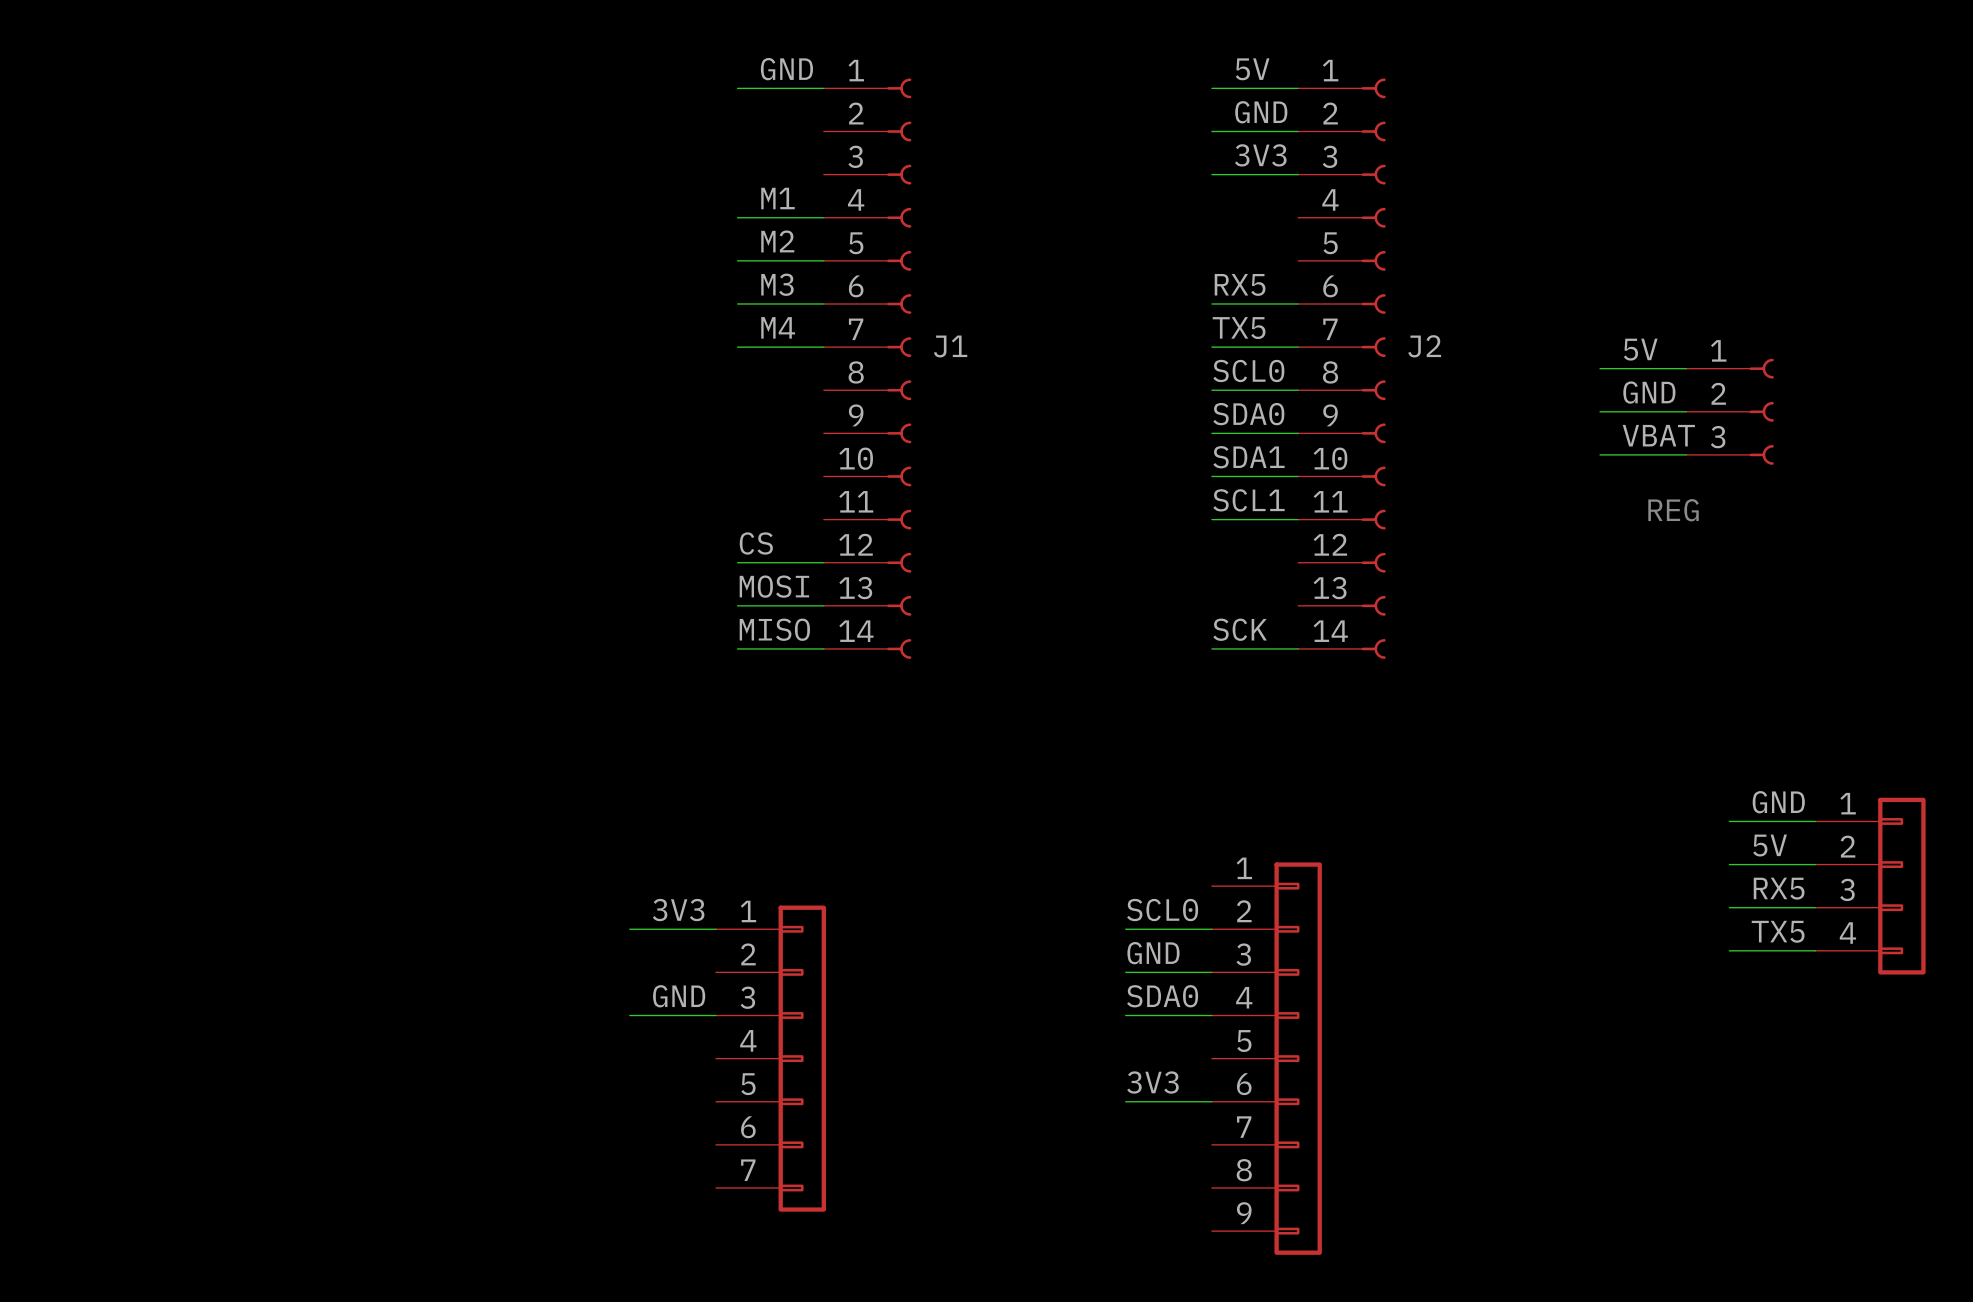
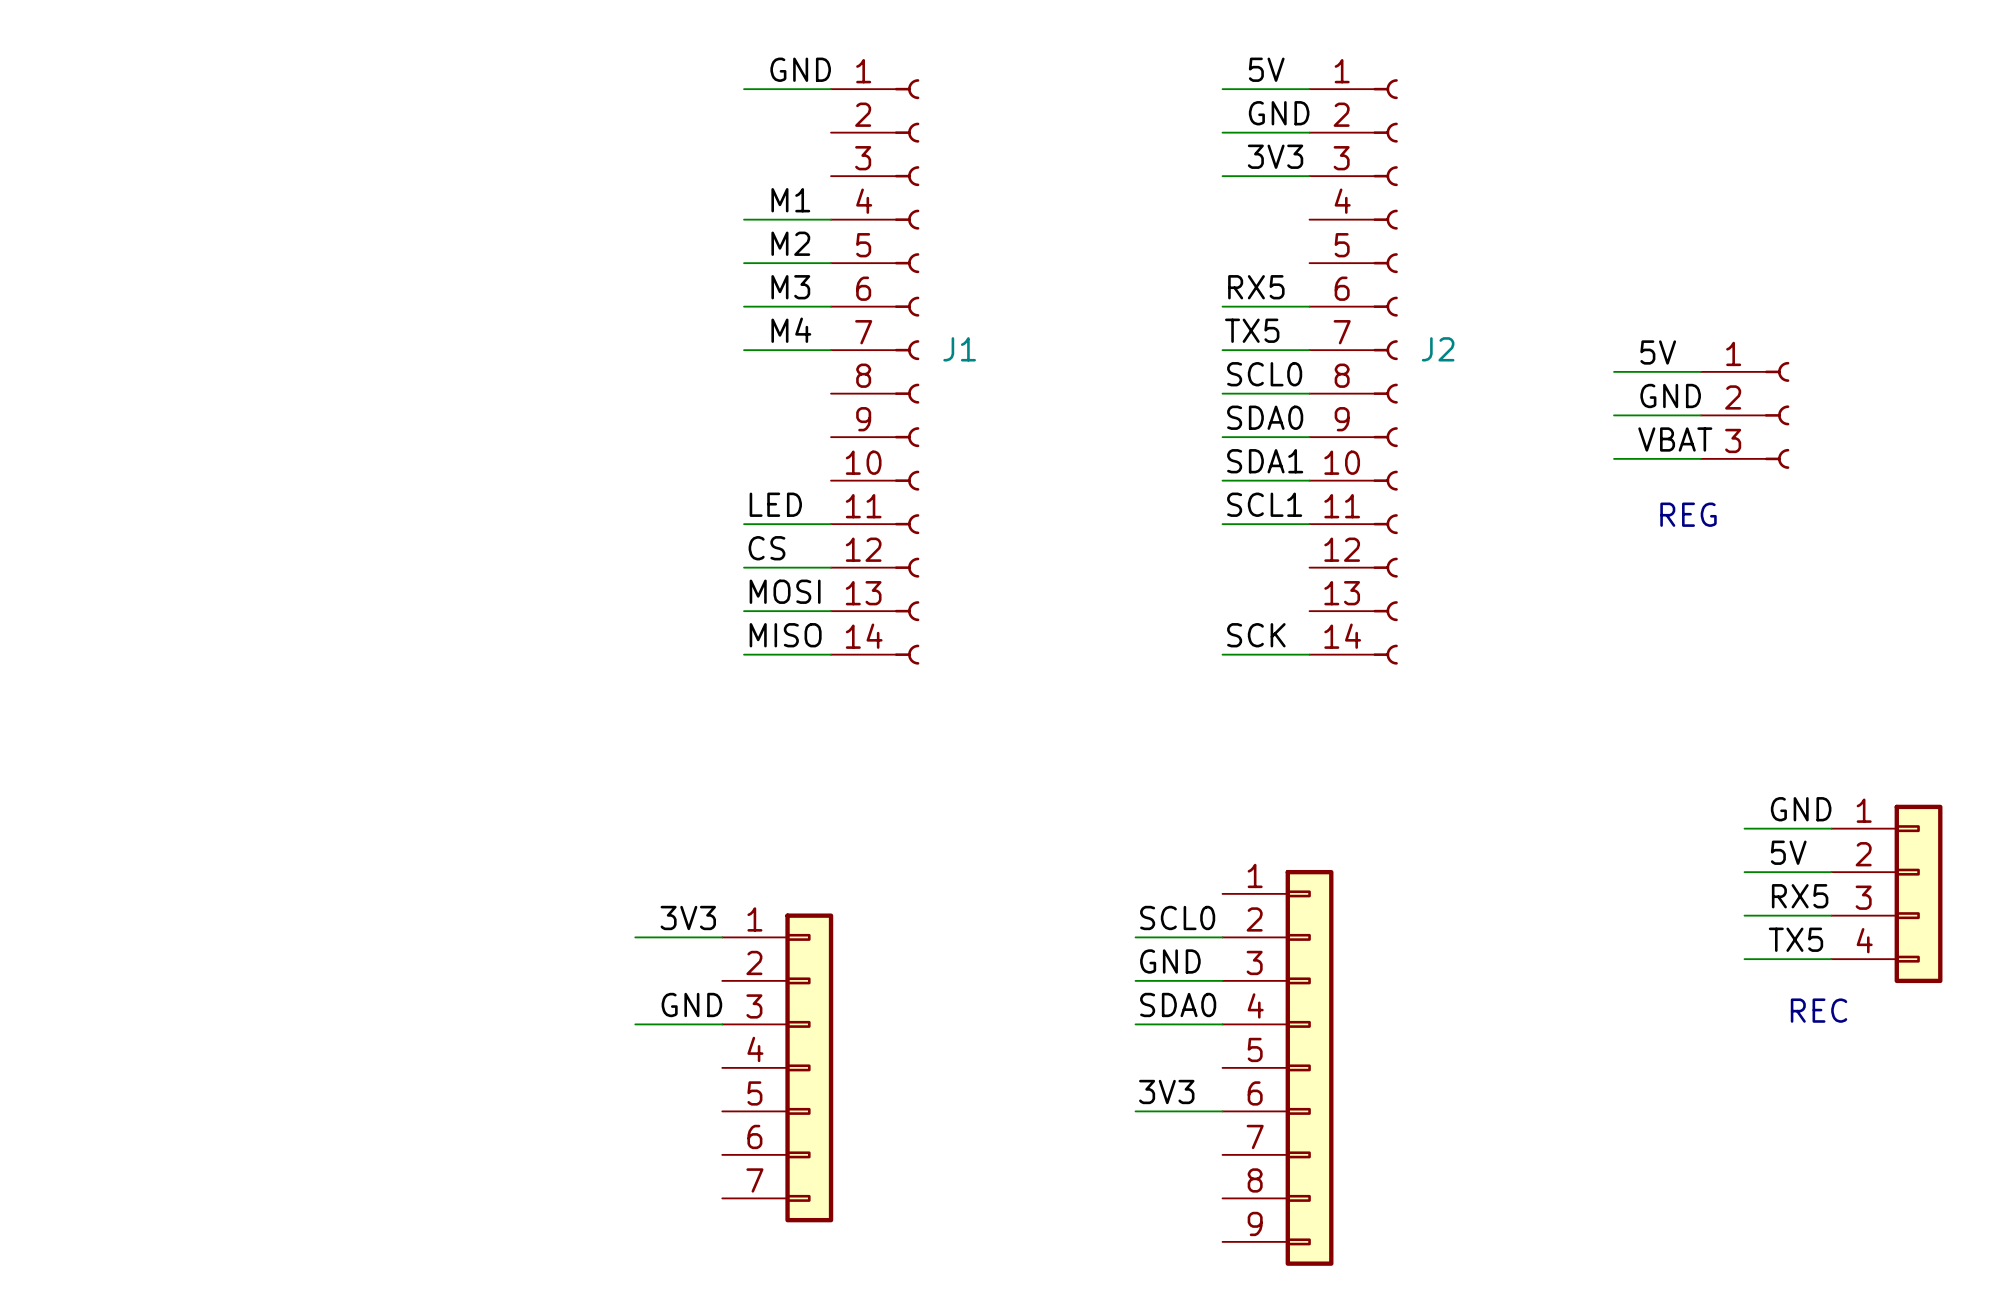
label: none -> LED (775, 504)
wire: none -> (744, 524) (831, 524)
text: none -> REC (1819, 1010)

